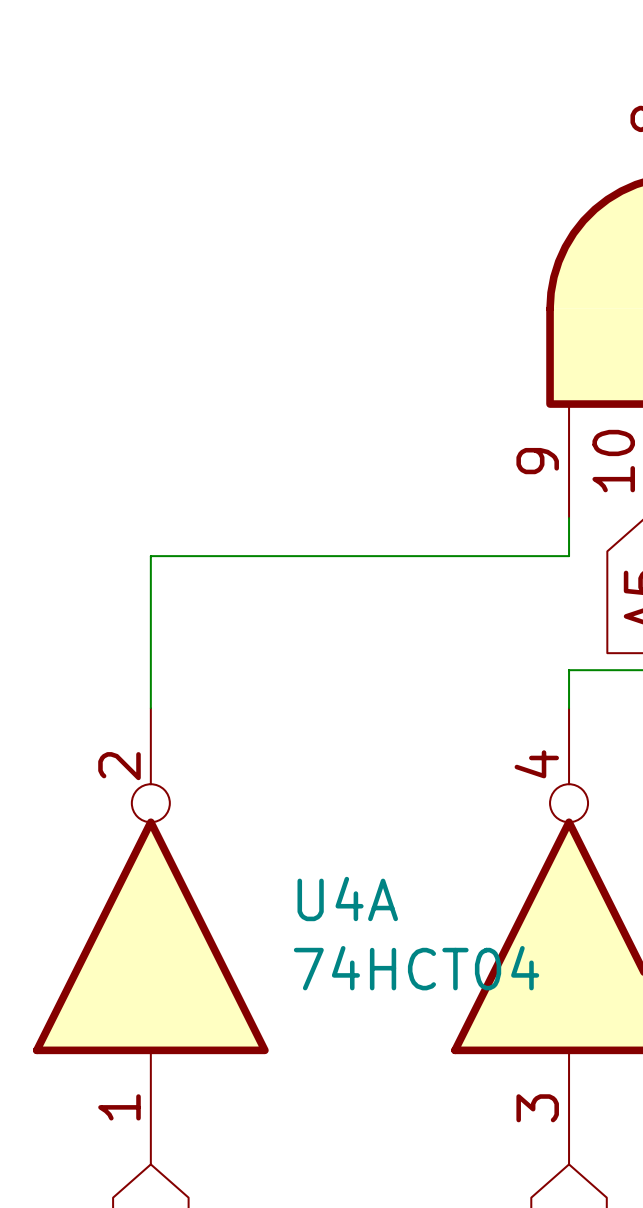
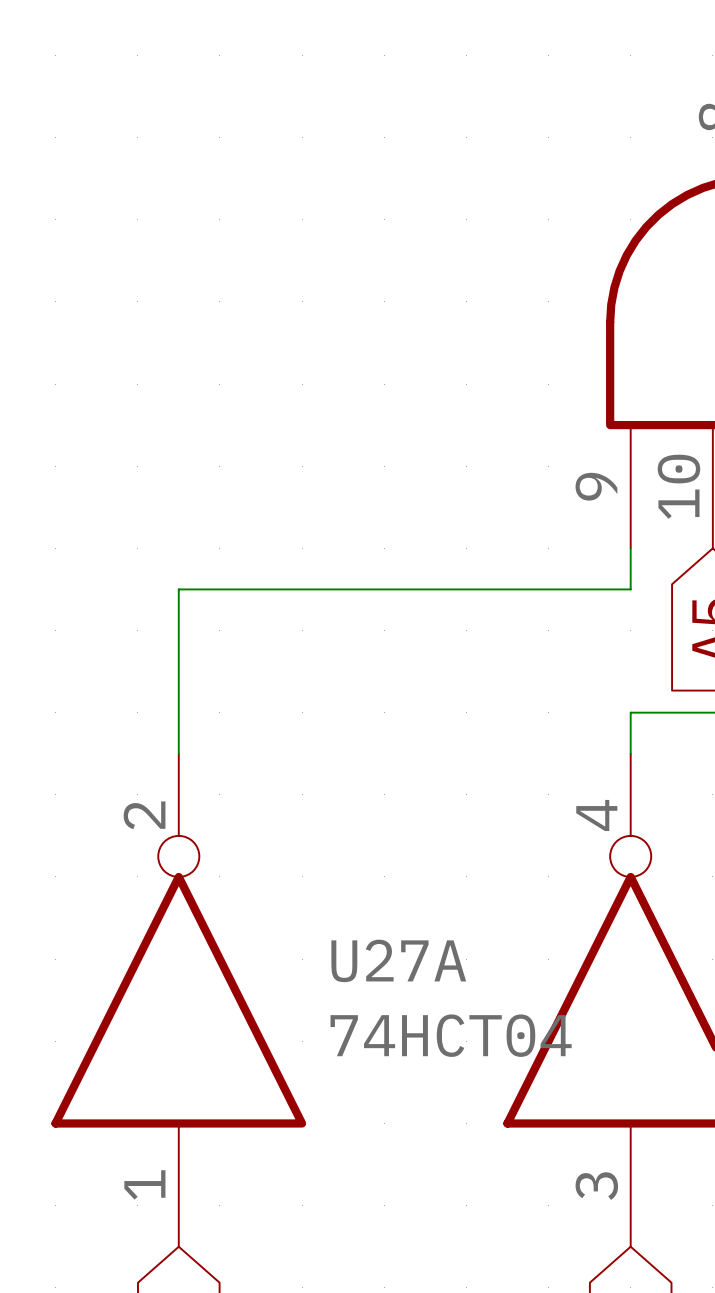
U4A name: U4A (347, 898) -> U27A (398, 960)

